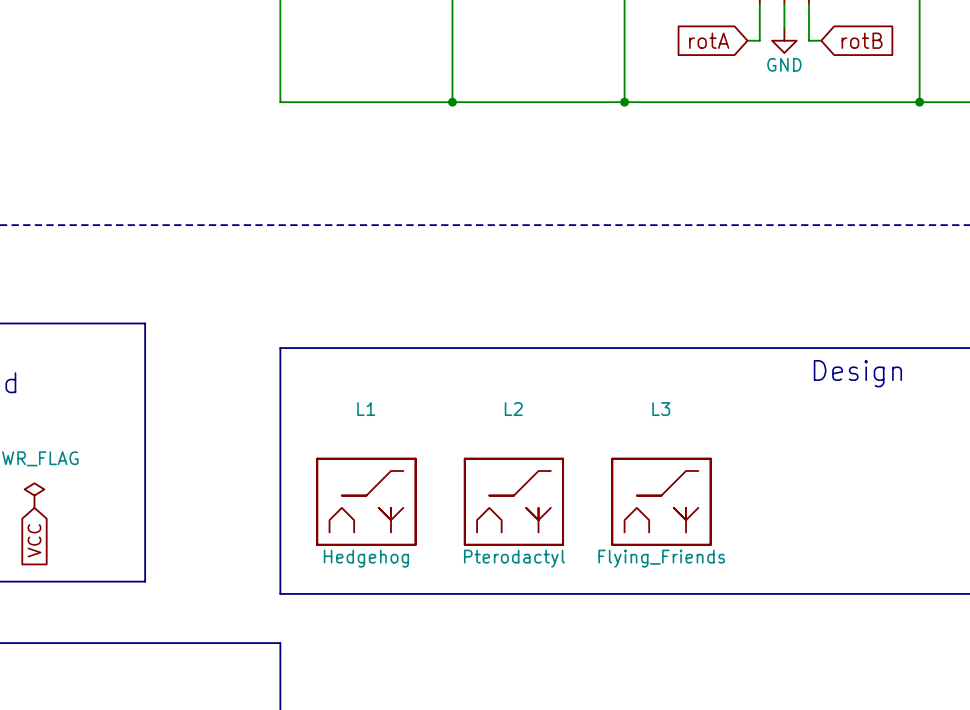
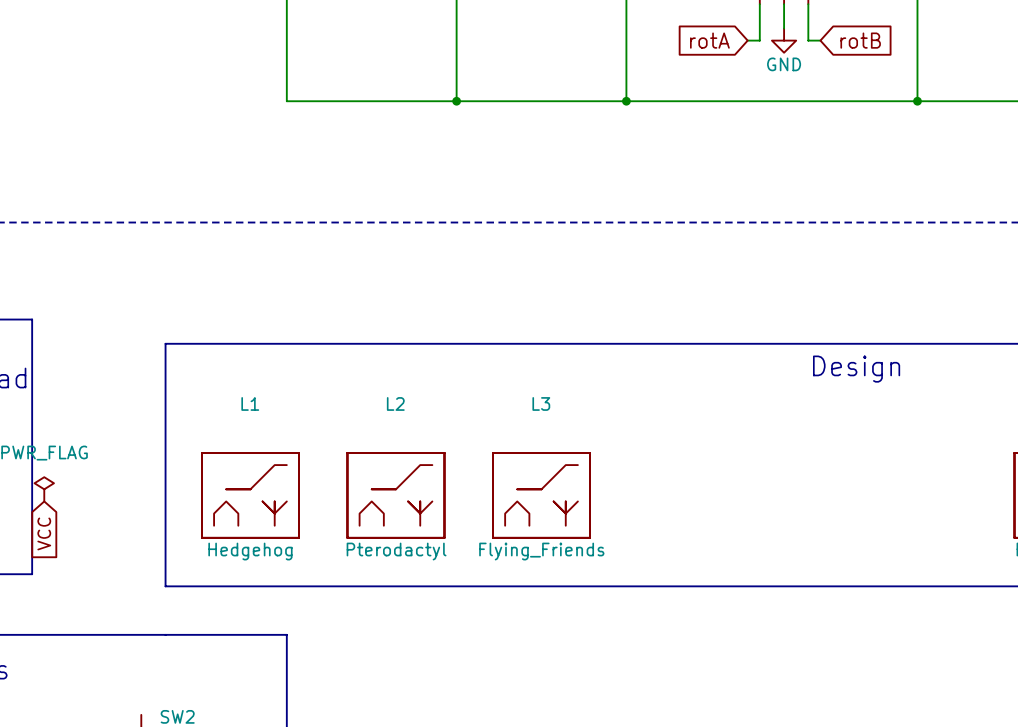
line: (22, 323) (145, 323) (145, 581) (22, 581) -> (32, 319) (32, 574)
line: (280, 348) (280, 593) -> (286, 343) (165, 343) (165, 586) (286, 586)
L1 position: (366, 501) -> (250, 495)
L2 position: (513, 501) -> (395, 495)
L3 position: (661, 501) -> (541, 495)

